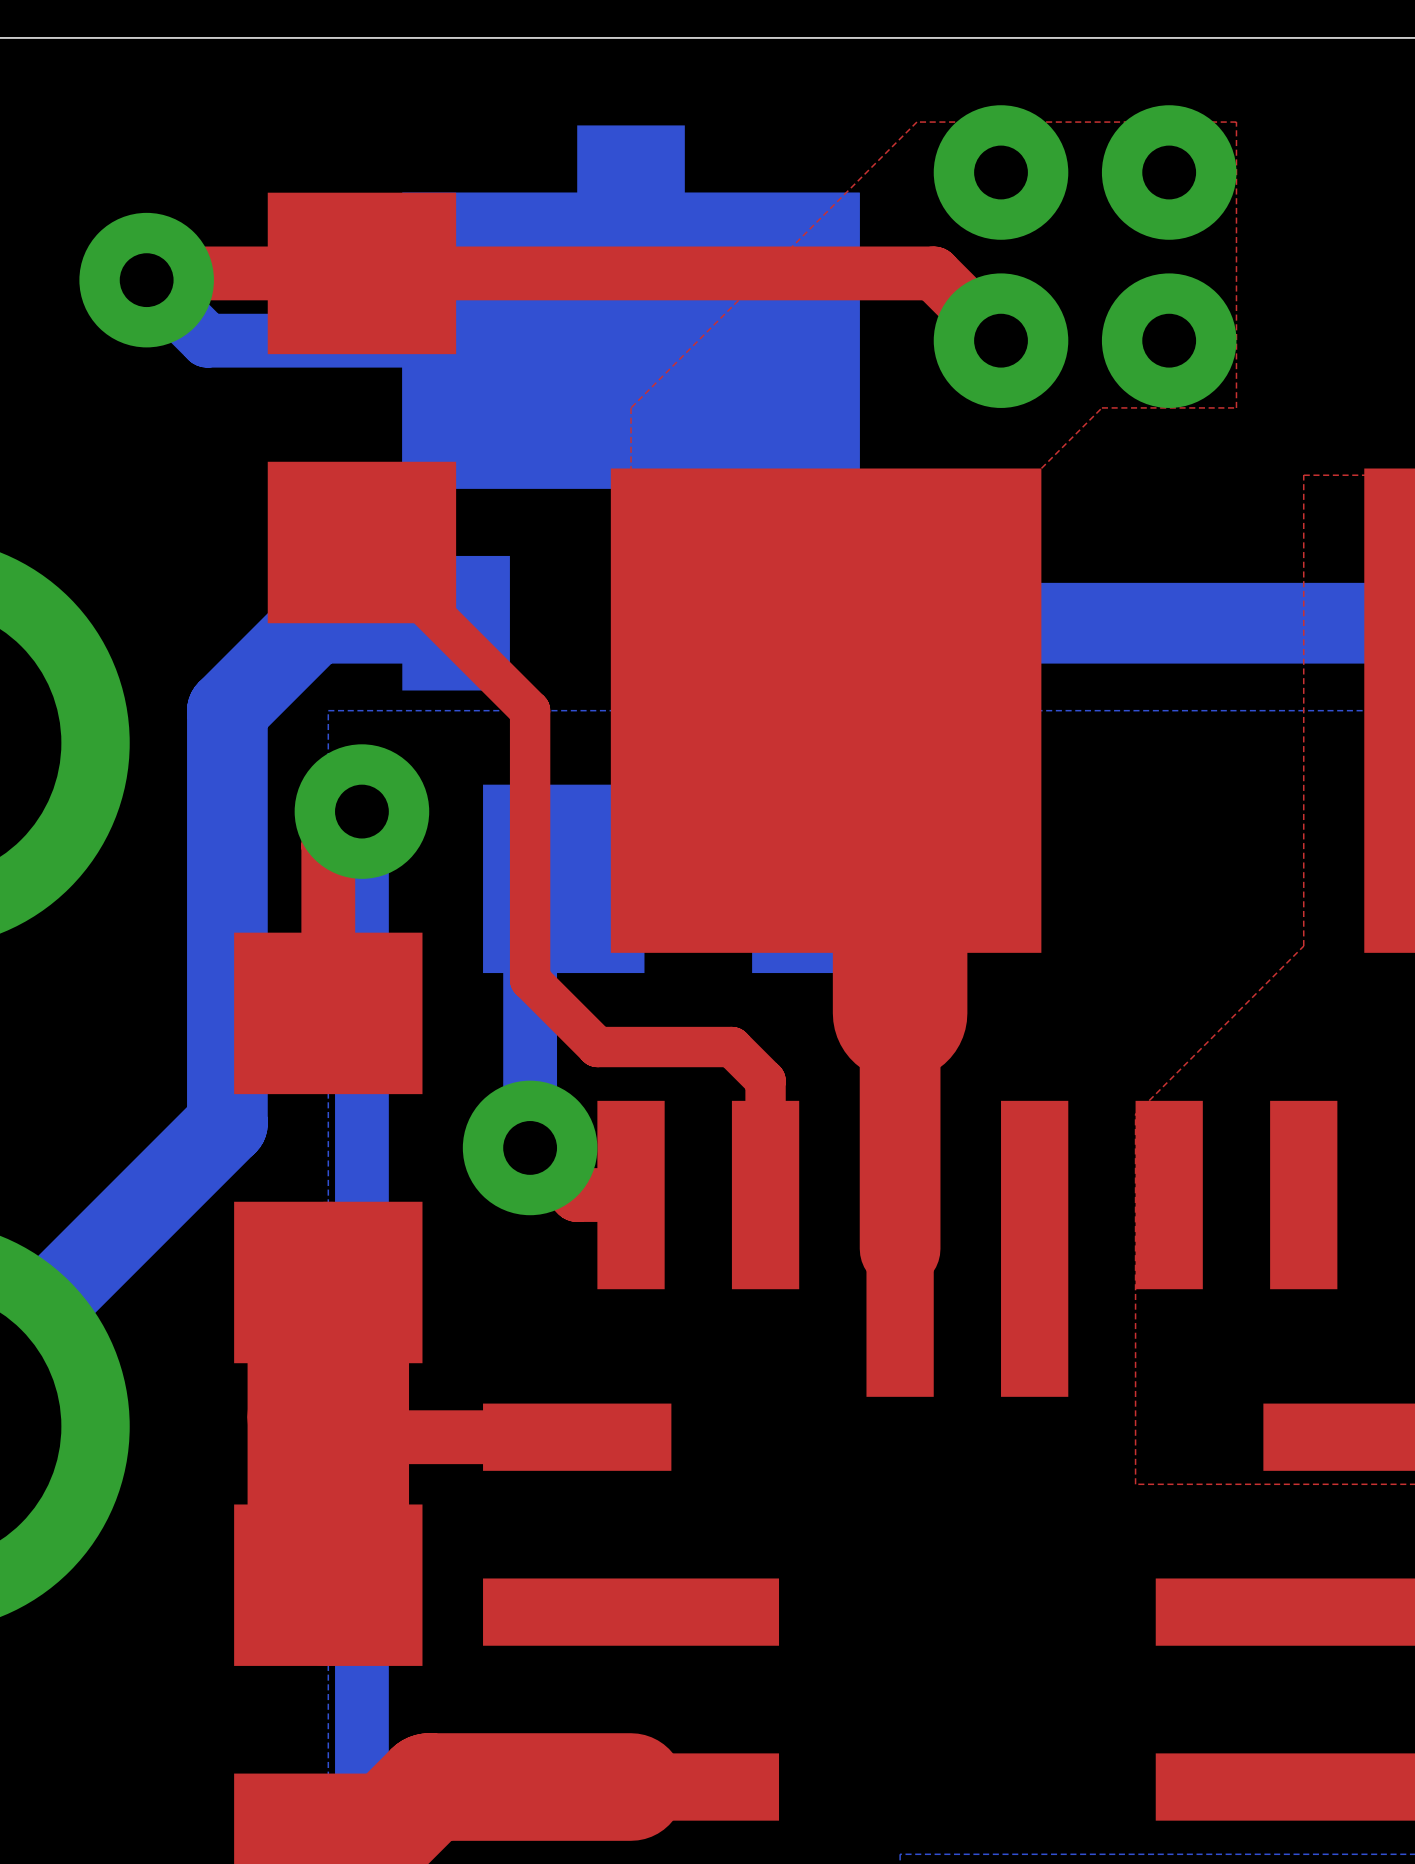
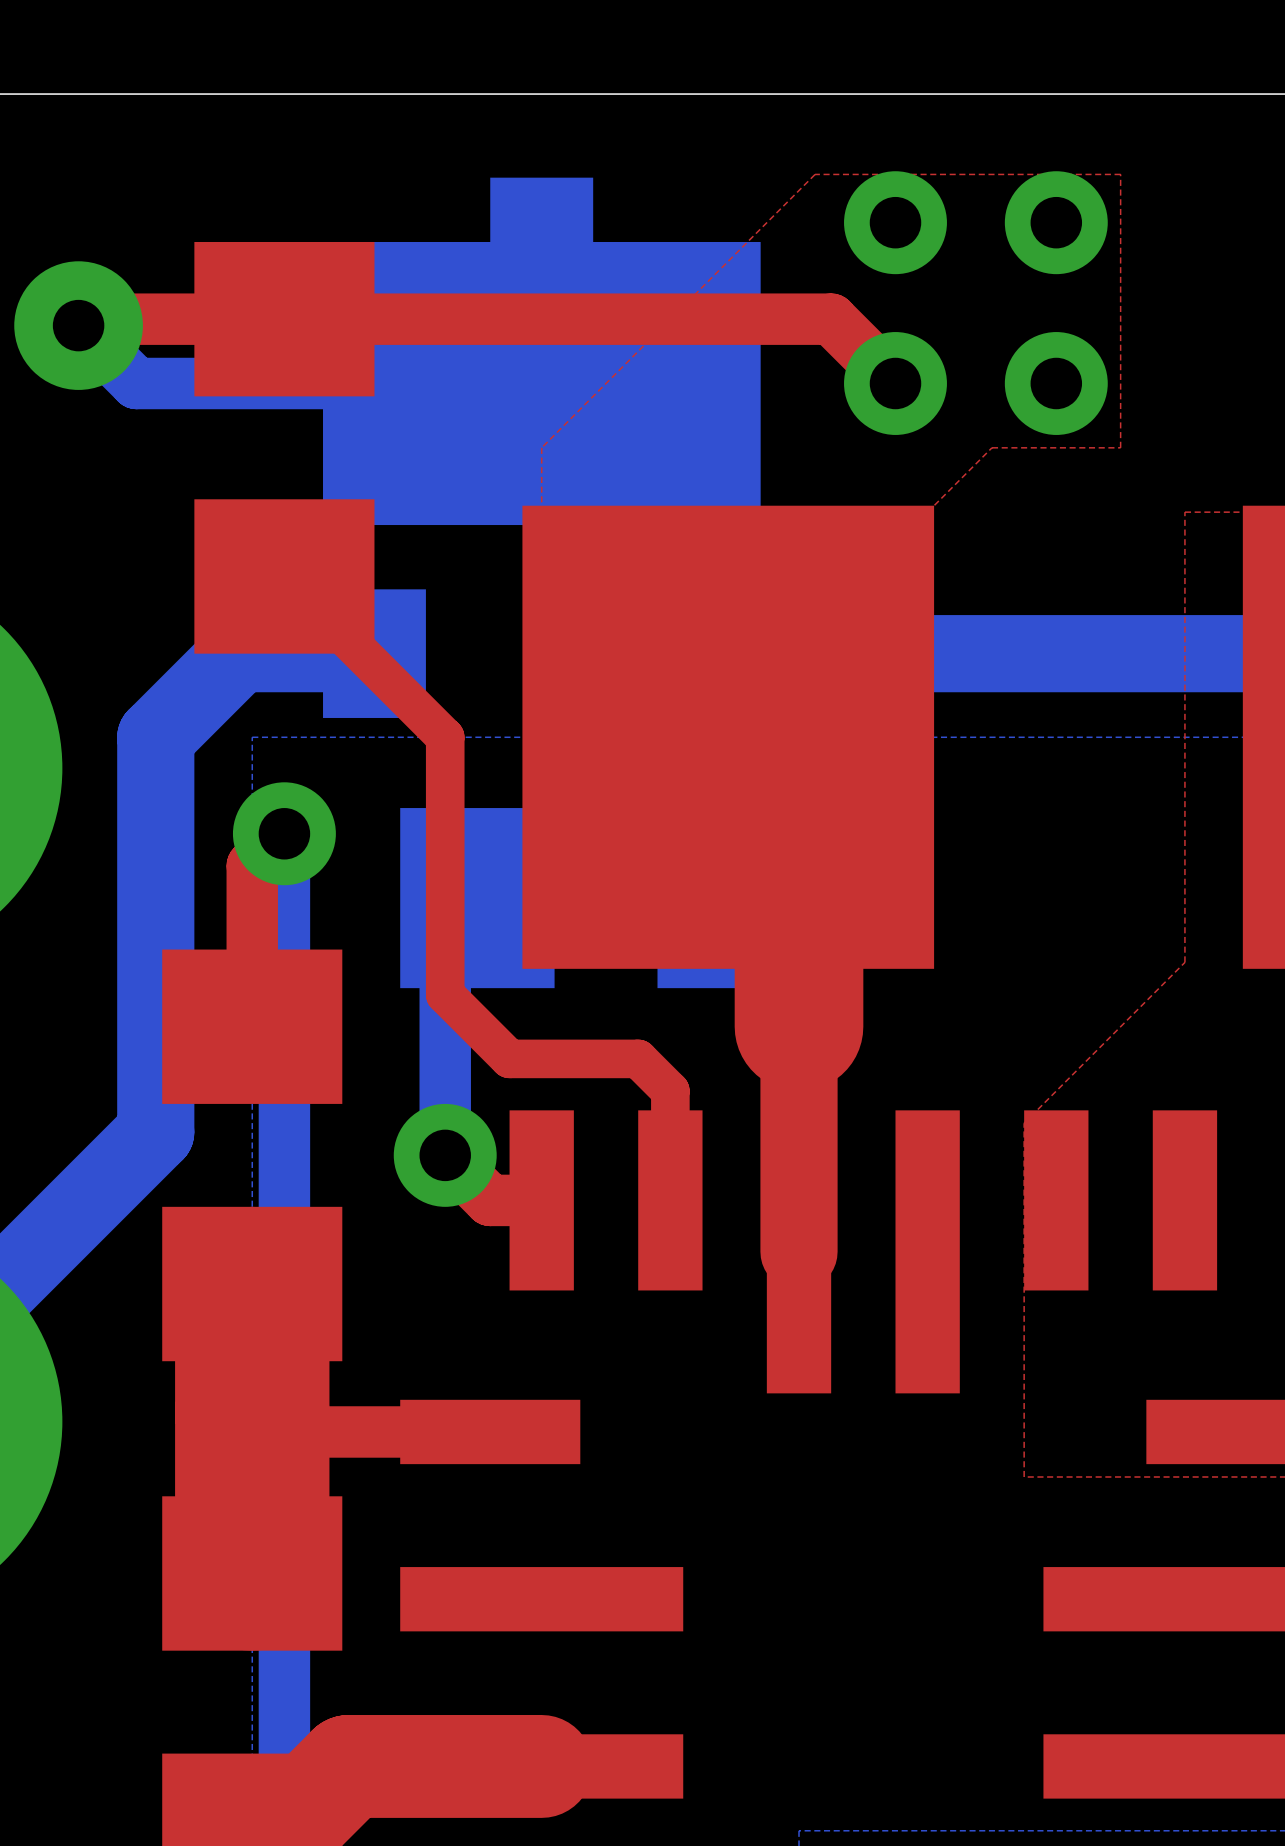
via size: [933, 105, 1069, 240] -> [844, 171, 947, 275]
via size: [1101, 105, 1237, 240] -> [1004, 171, 1108, 275]
via size: [933, 273, 1069, 408] -> [844, 332, 947, 435]
via size: [1101, 273, 1237, 408] -> [1004, 332, 1108, 435]
via size: [294, 744, 430, 879] -> [232, 782, 336, 886]
via size: [462, 1080, 598, 1216] -> [393, 1103, 497, 1207]

